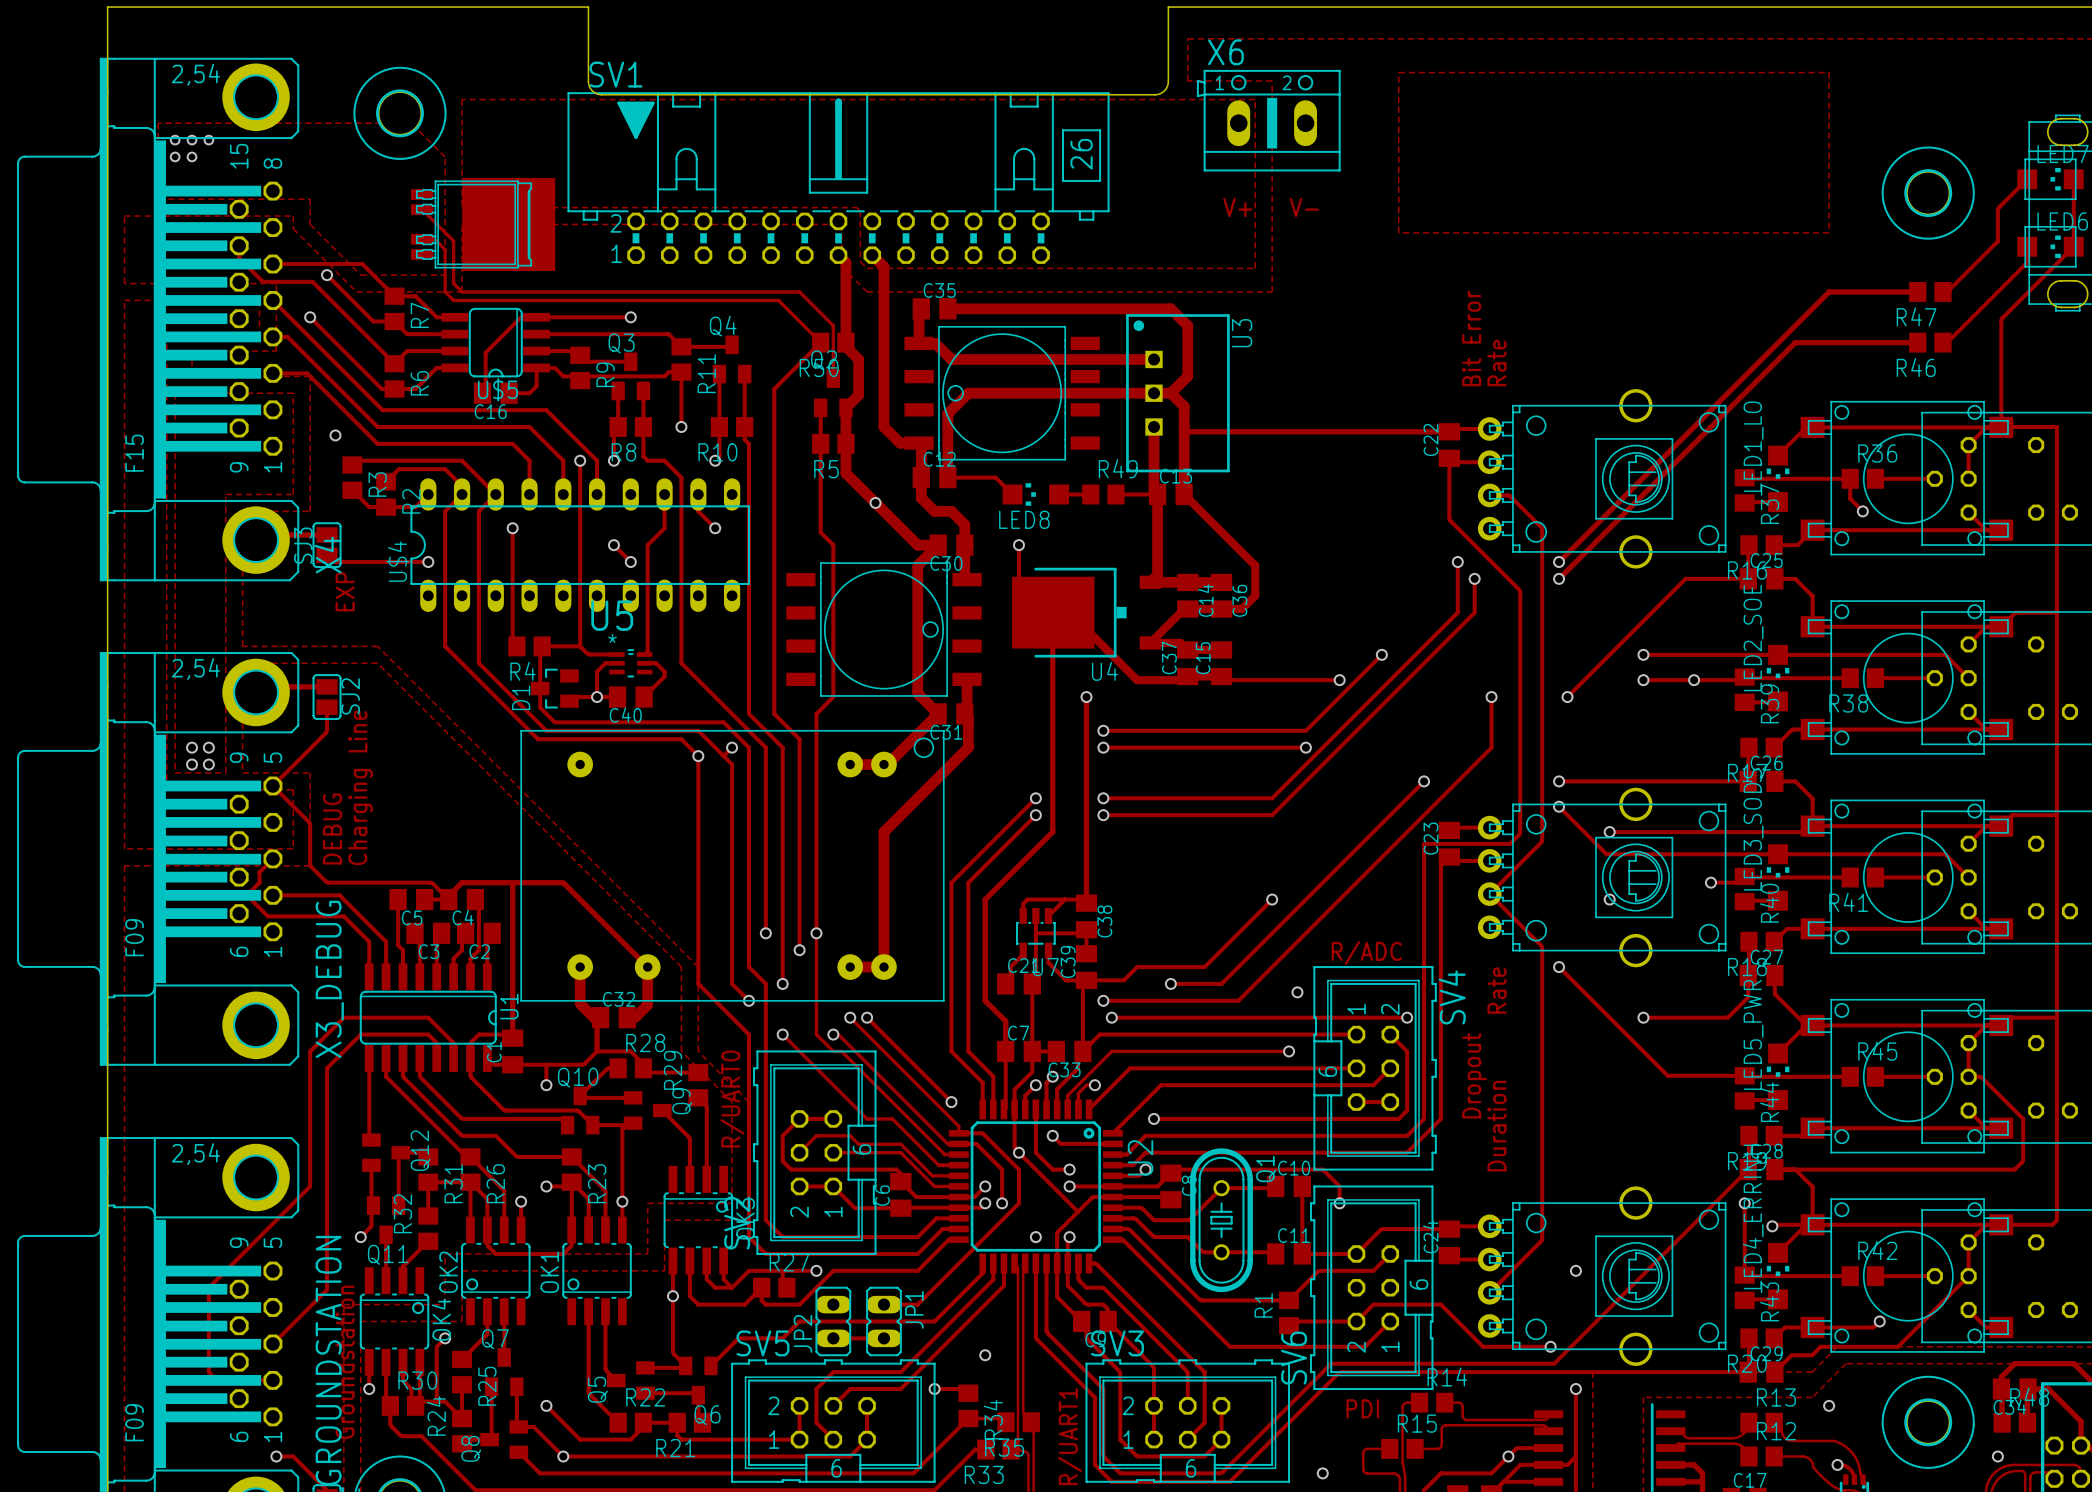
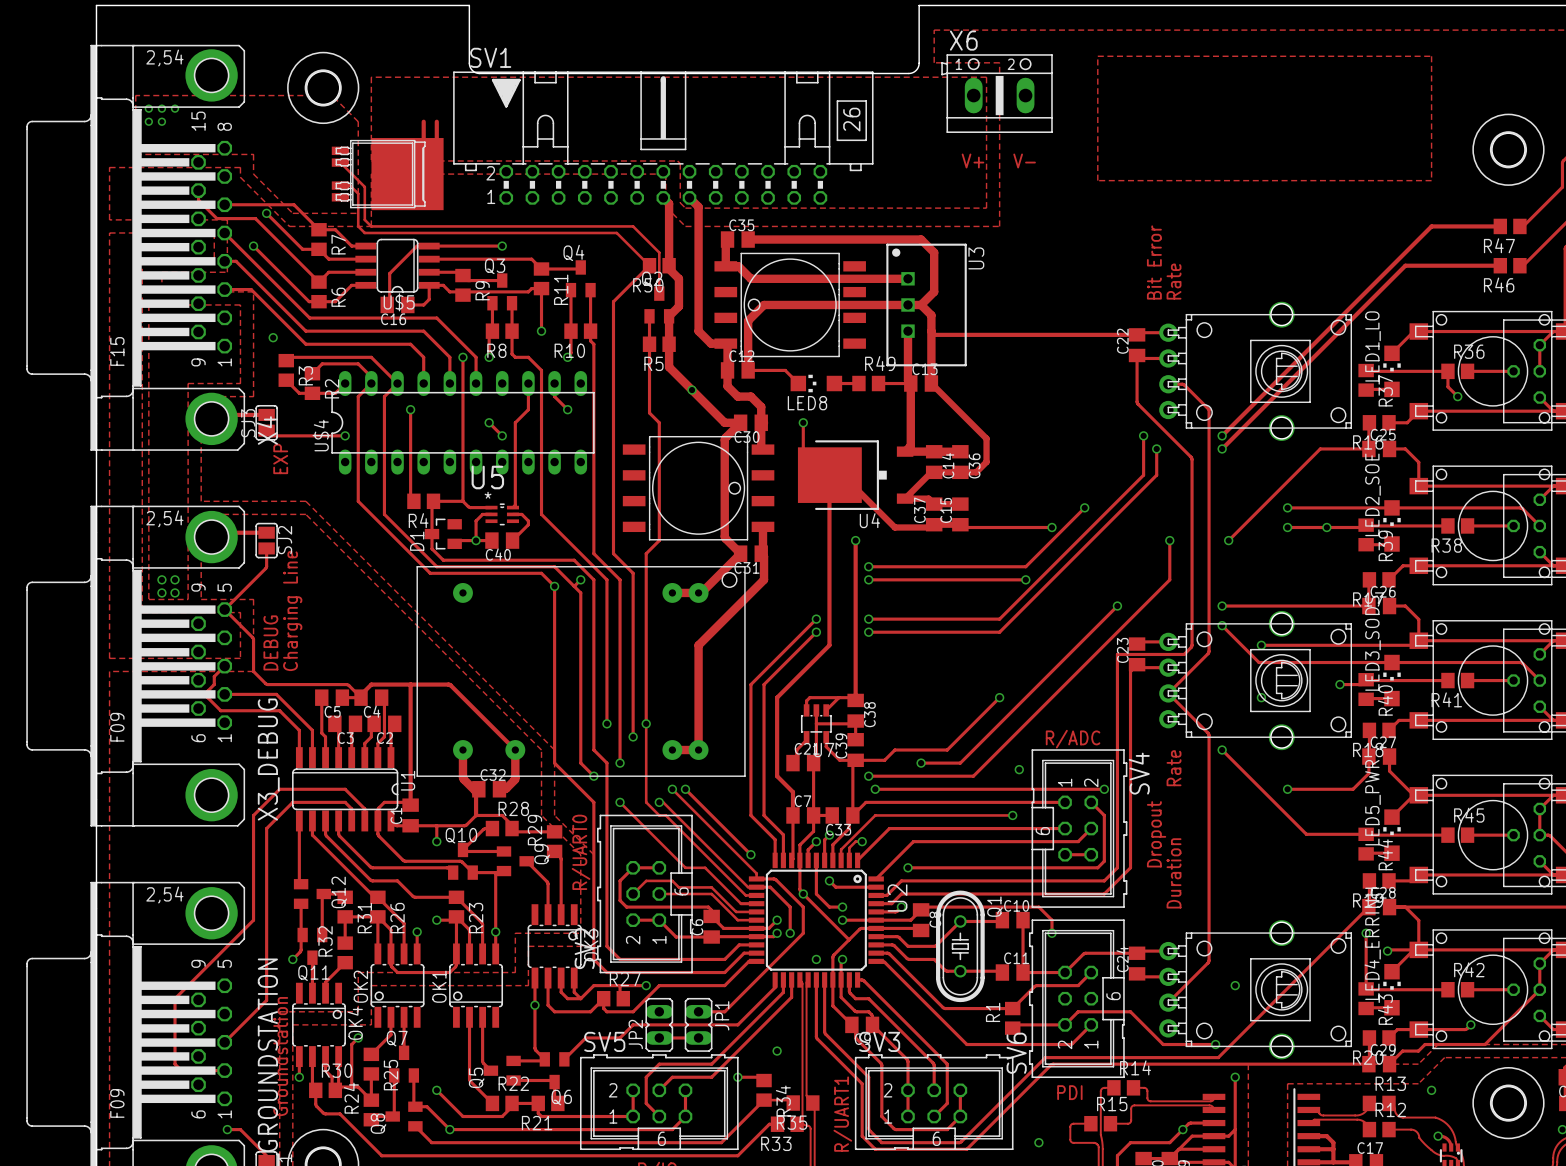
track: none -> (423, 121) (423, 147)
track: none -> (436, 121) (436, 147)

